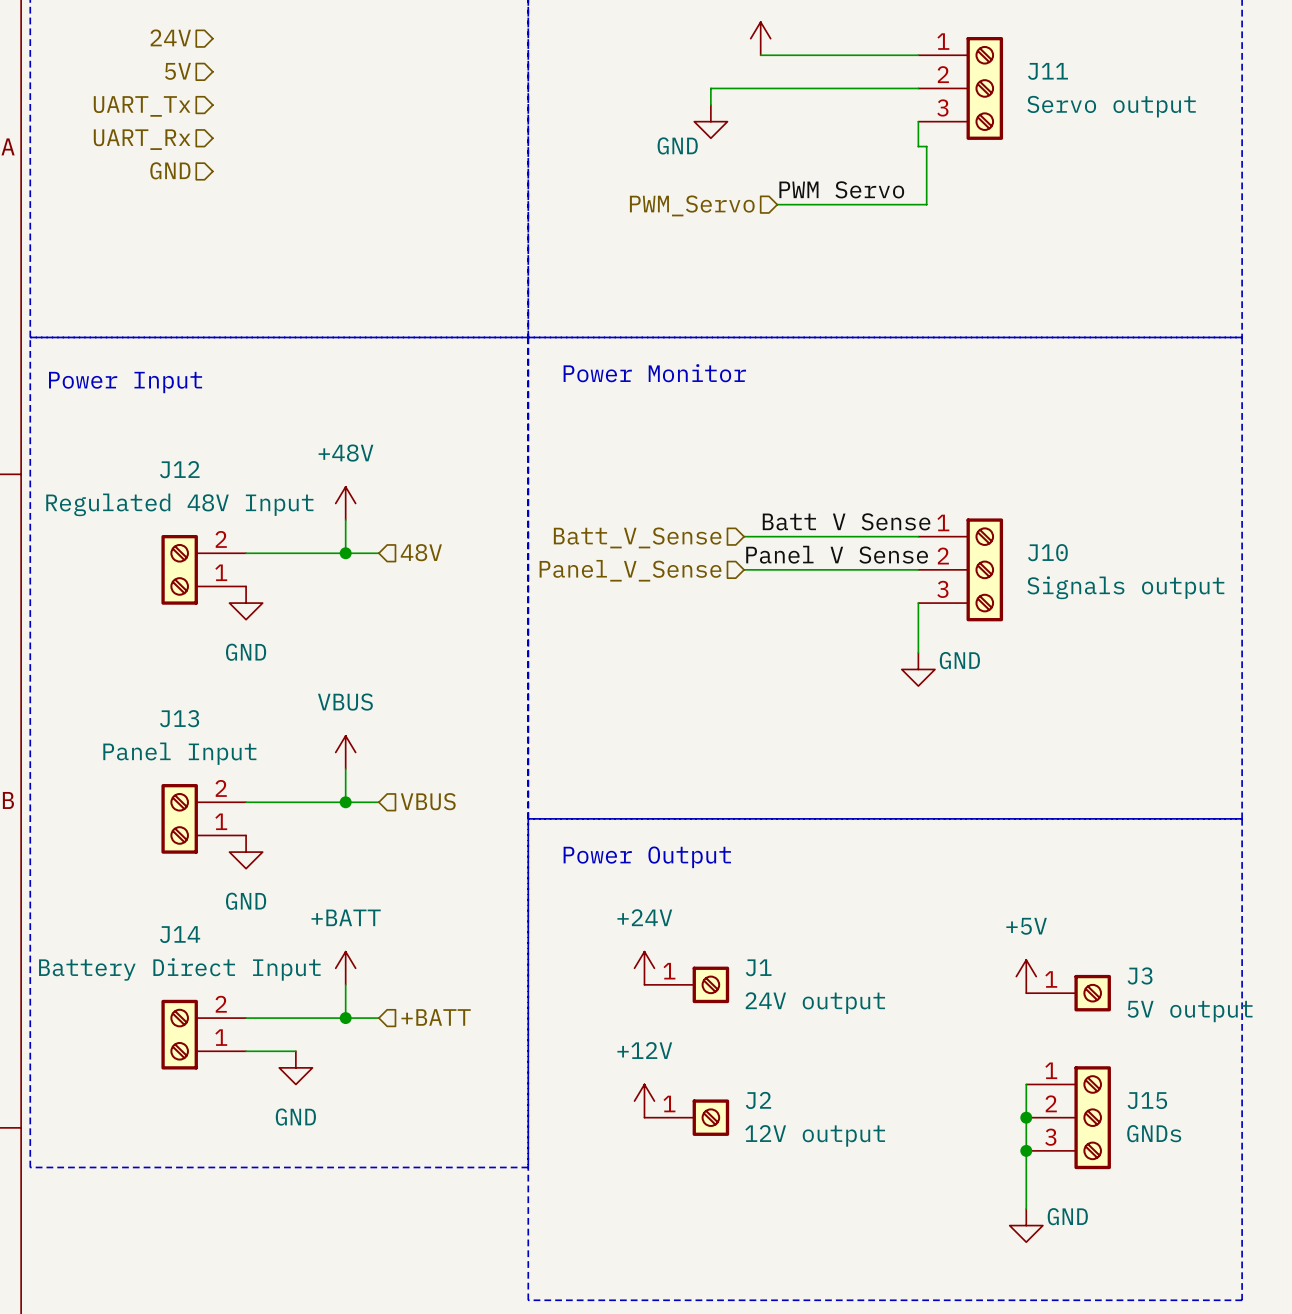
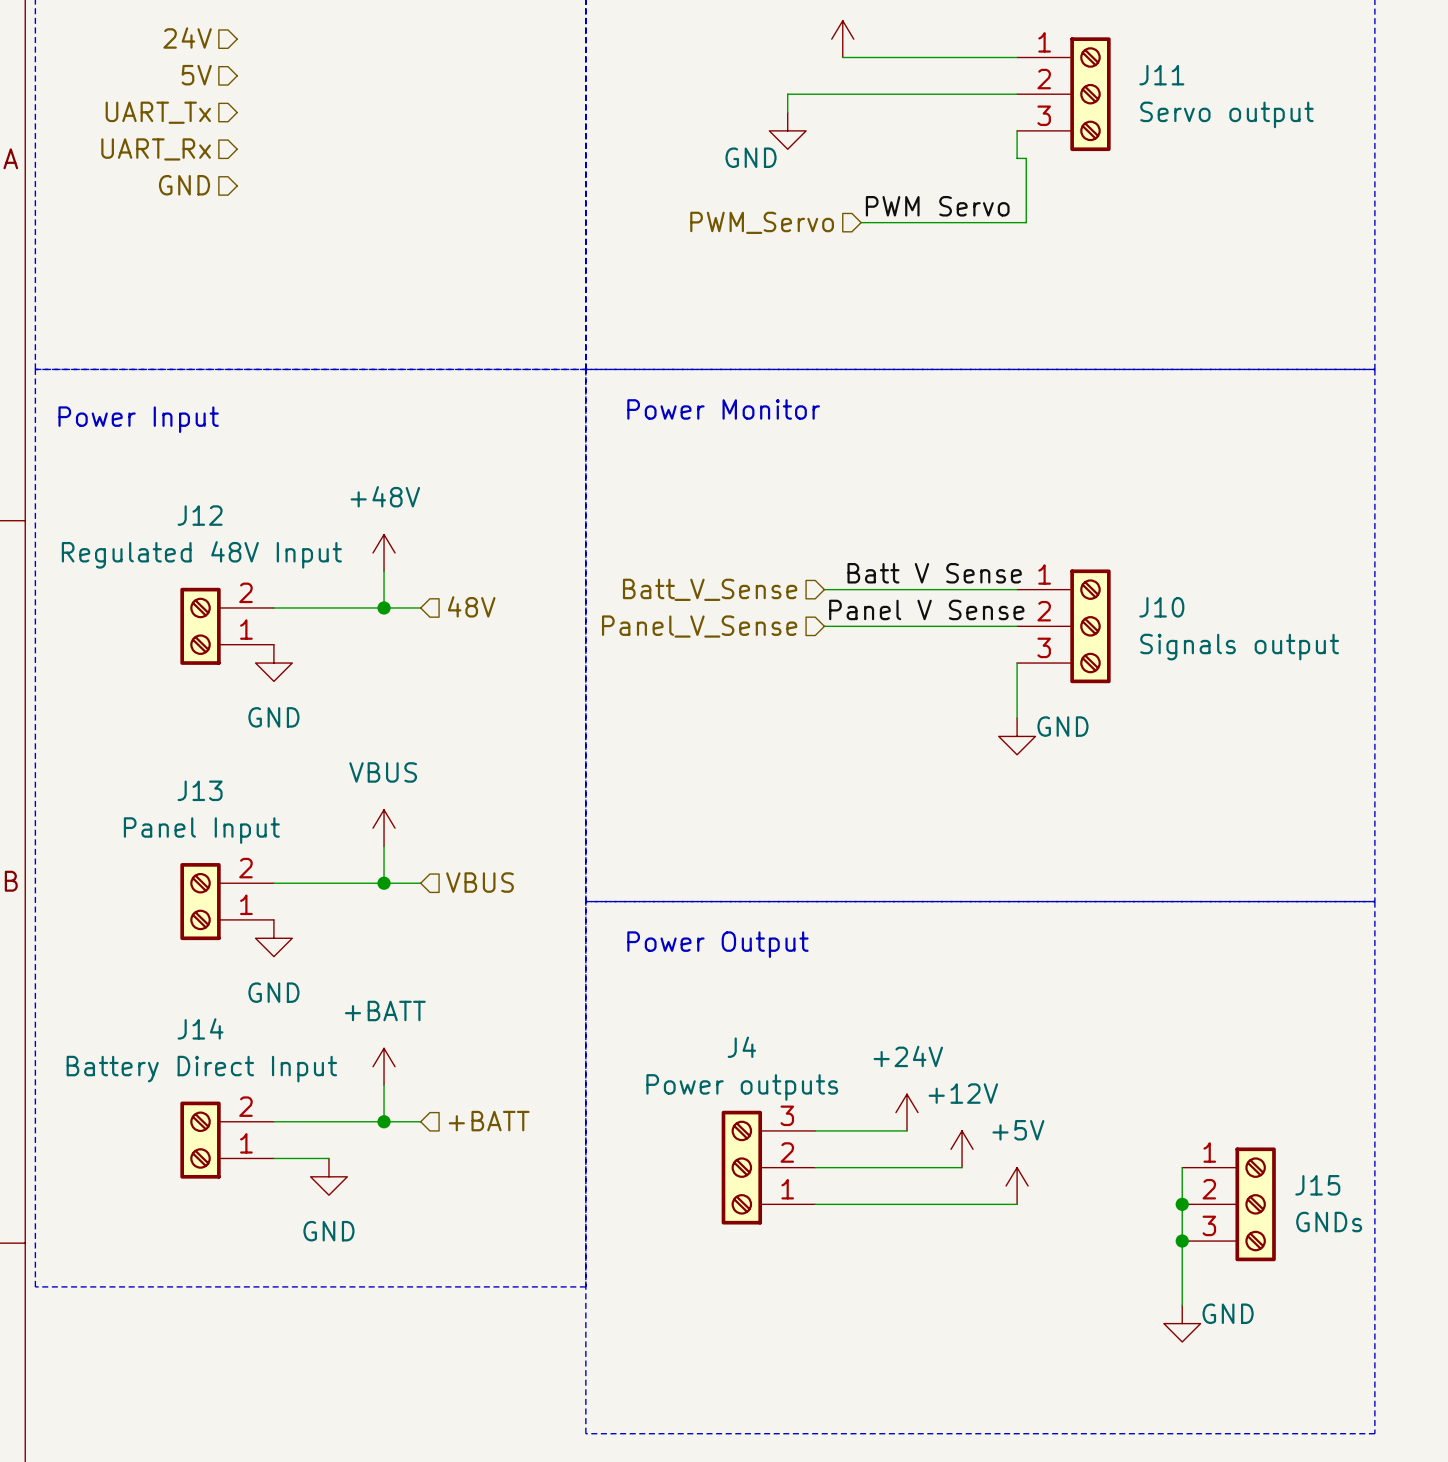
power symbol position: +24V (644, 968) -> +24V (906, 1112)
power symbol position: +5V (1026, 976) -> +5V (1017, 1185)
J1: 24V output (686, 984) -> none
J3: 5V output (1068, 993) -> none
wire: none -> (815, 1130) (906, 1130)
J4: none -> Power outputs (768, 1167)
wire: none -> (815, 1167) (962, 1167)
wire: (1026, 1084) (1026, 1208) -> (1182, 1167) (1182, 1305)
wire: none -> (815, 1204) (1017, 1204)
junction: none -> (1182, 1204)
power symbol position: +12V (644, 1101) -> +12V (962, 1149)
J2: 12V output (686, 1117) -> none
junction: (1026, 1117) -> none
J15 position: (1068, 1117) -> (1229, 1204)
junction: none -> (1182, 1241)
junction: (1026, 1150) -> none
power symbol position: GND (1026, 1225) -> GND (1182, 1323)

